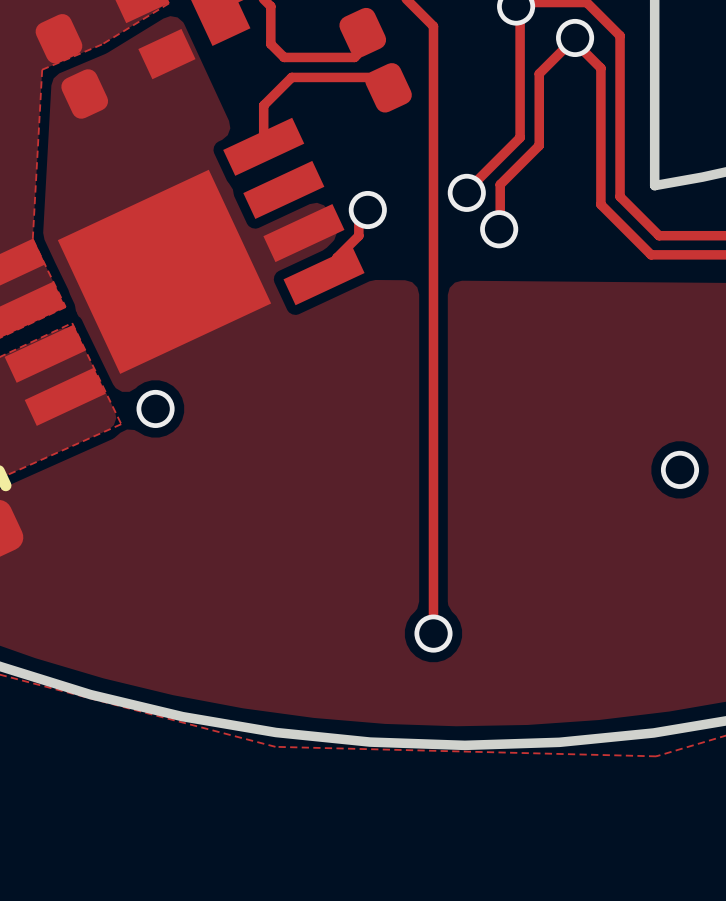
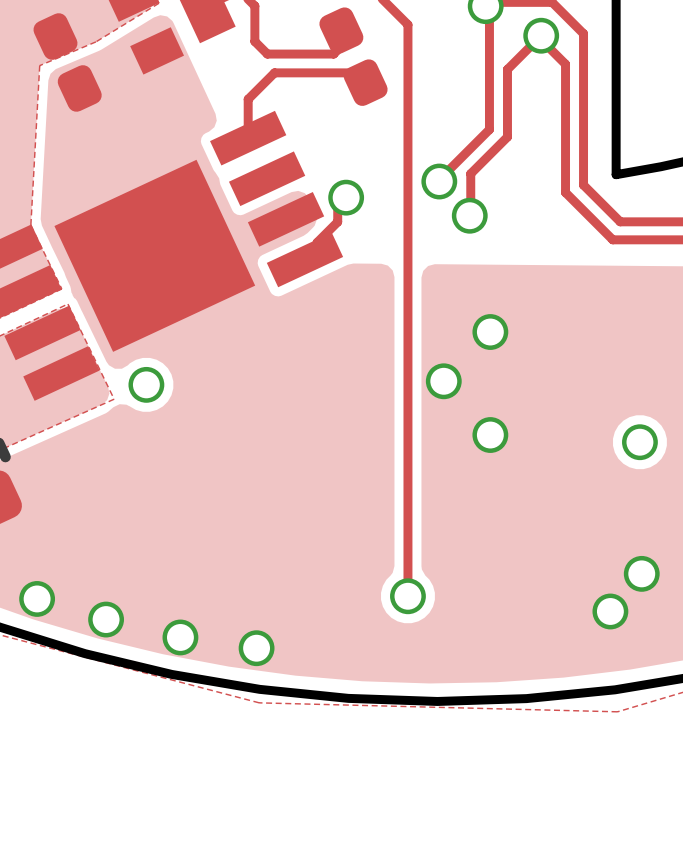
via: none -> (490, 332)
via: none -> (443, 381)
via: none -> (490, 435)
via: none -> (641, 573)
via: none -> (37, 598)
via: none -> (610, 611)
via: none -> (106, 619)
via: none -> (180, 637)
via: none -> (256, 648)

